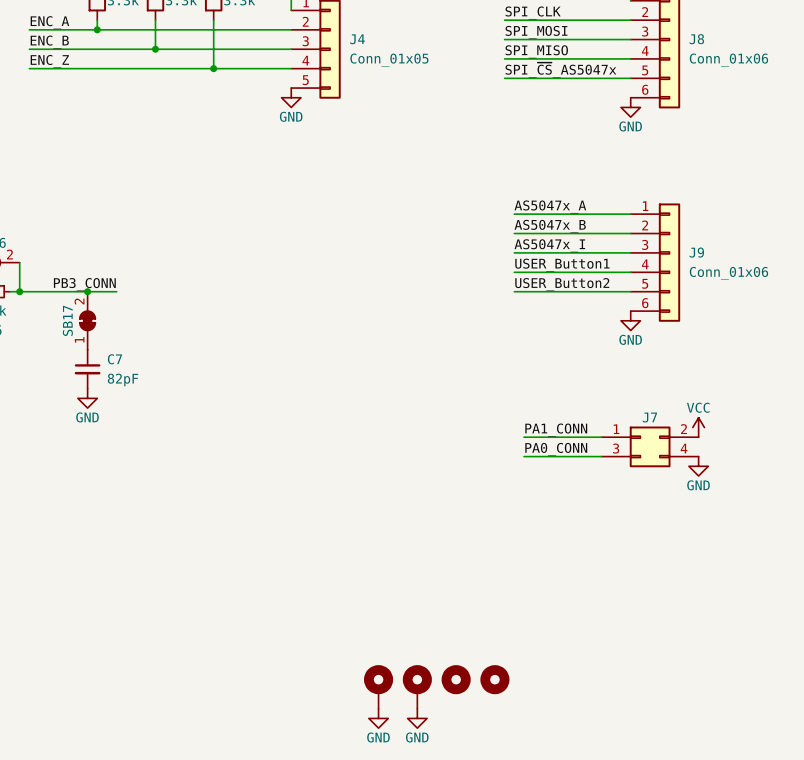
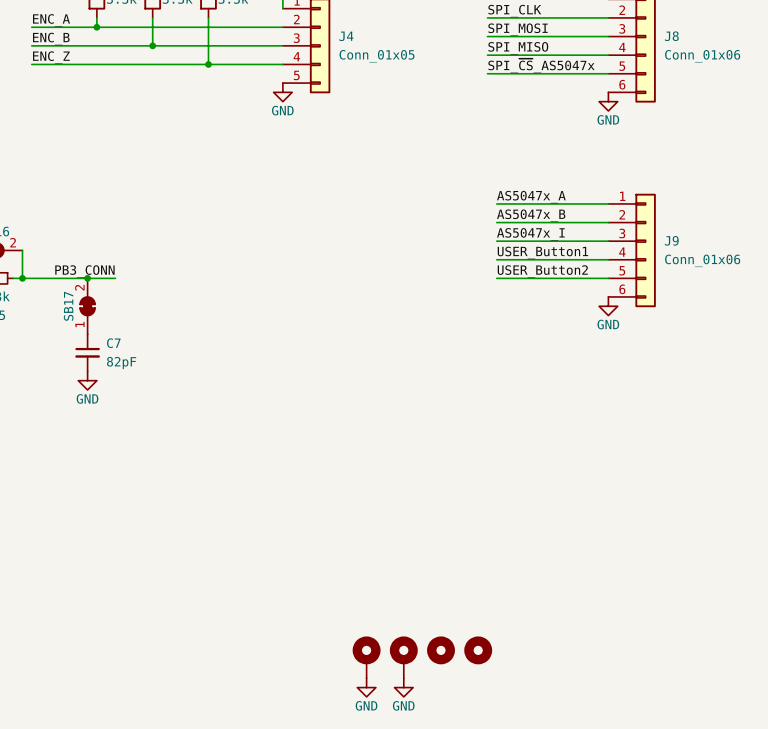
power symbol: VCC (698, 427) -> none
label: PA1_CONN (556, 430) -> none
wire: (524, 437) (601, 437) -> none
J7: (650, 446) -> none
label: PA0_CONN (556, 449) -> none
wire: (524, 456) (601, 456) -> none
power symbol: GND (698, 466) -> none

